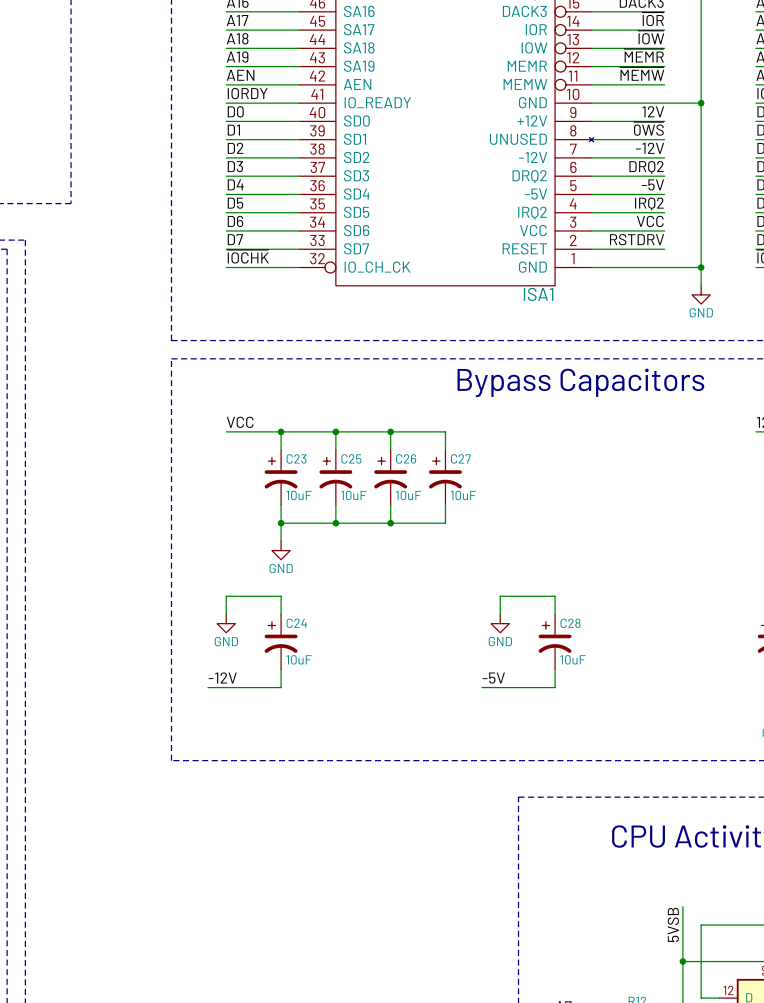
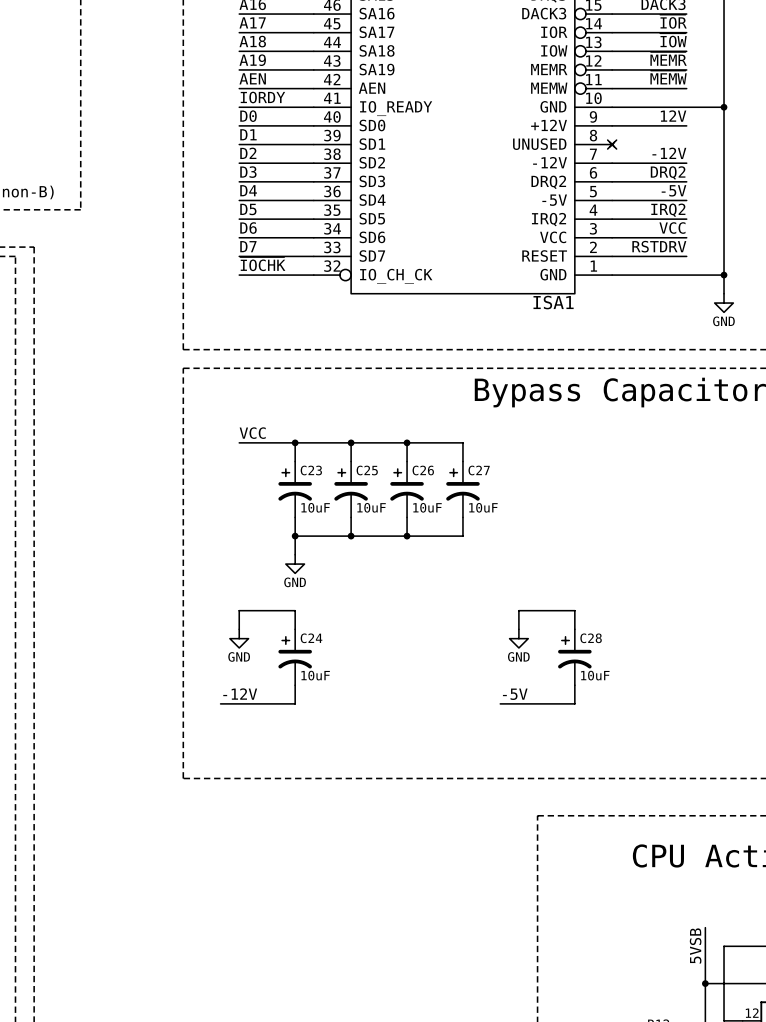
label: ~{0WS} (648, 128) -> none
wire: (591, 139) (664, 139) -> none
no-connect mark: none -> (612, 144)

